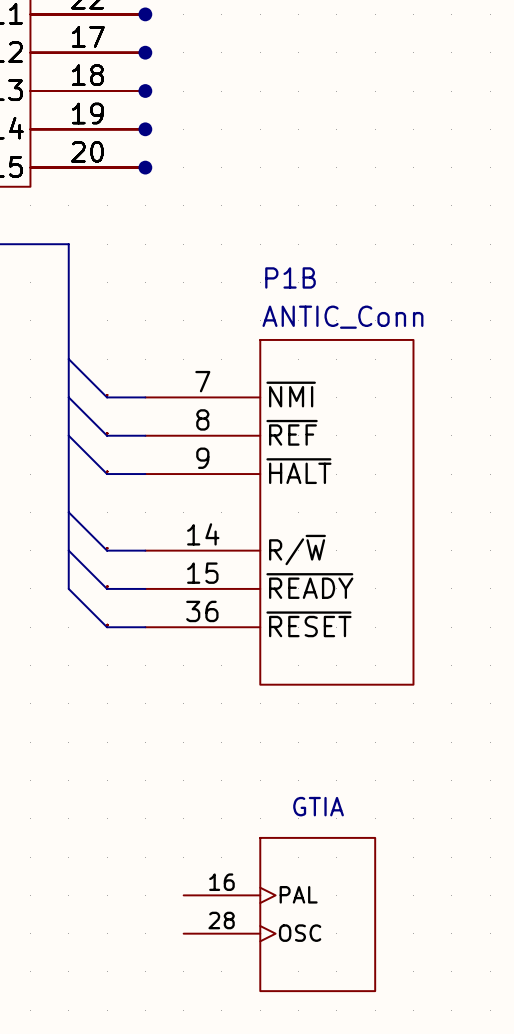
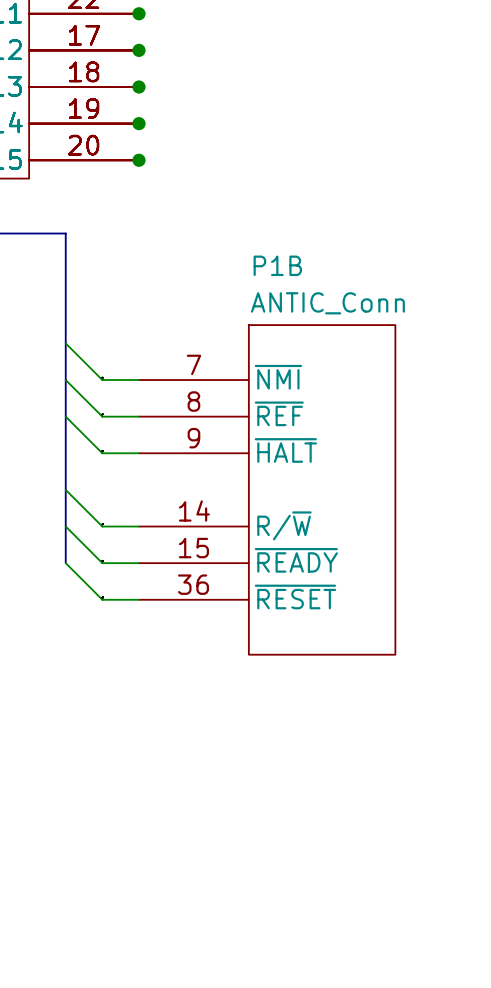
part: GTIA (279, 914) -> none

